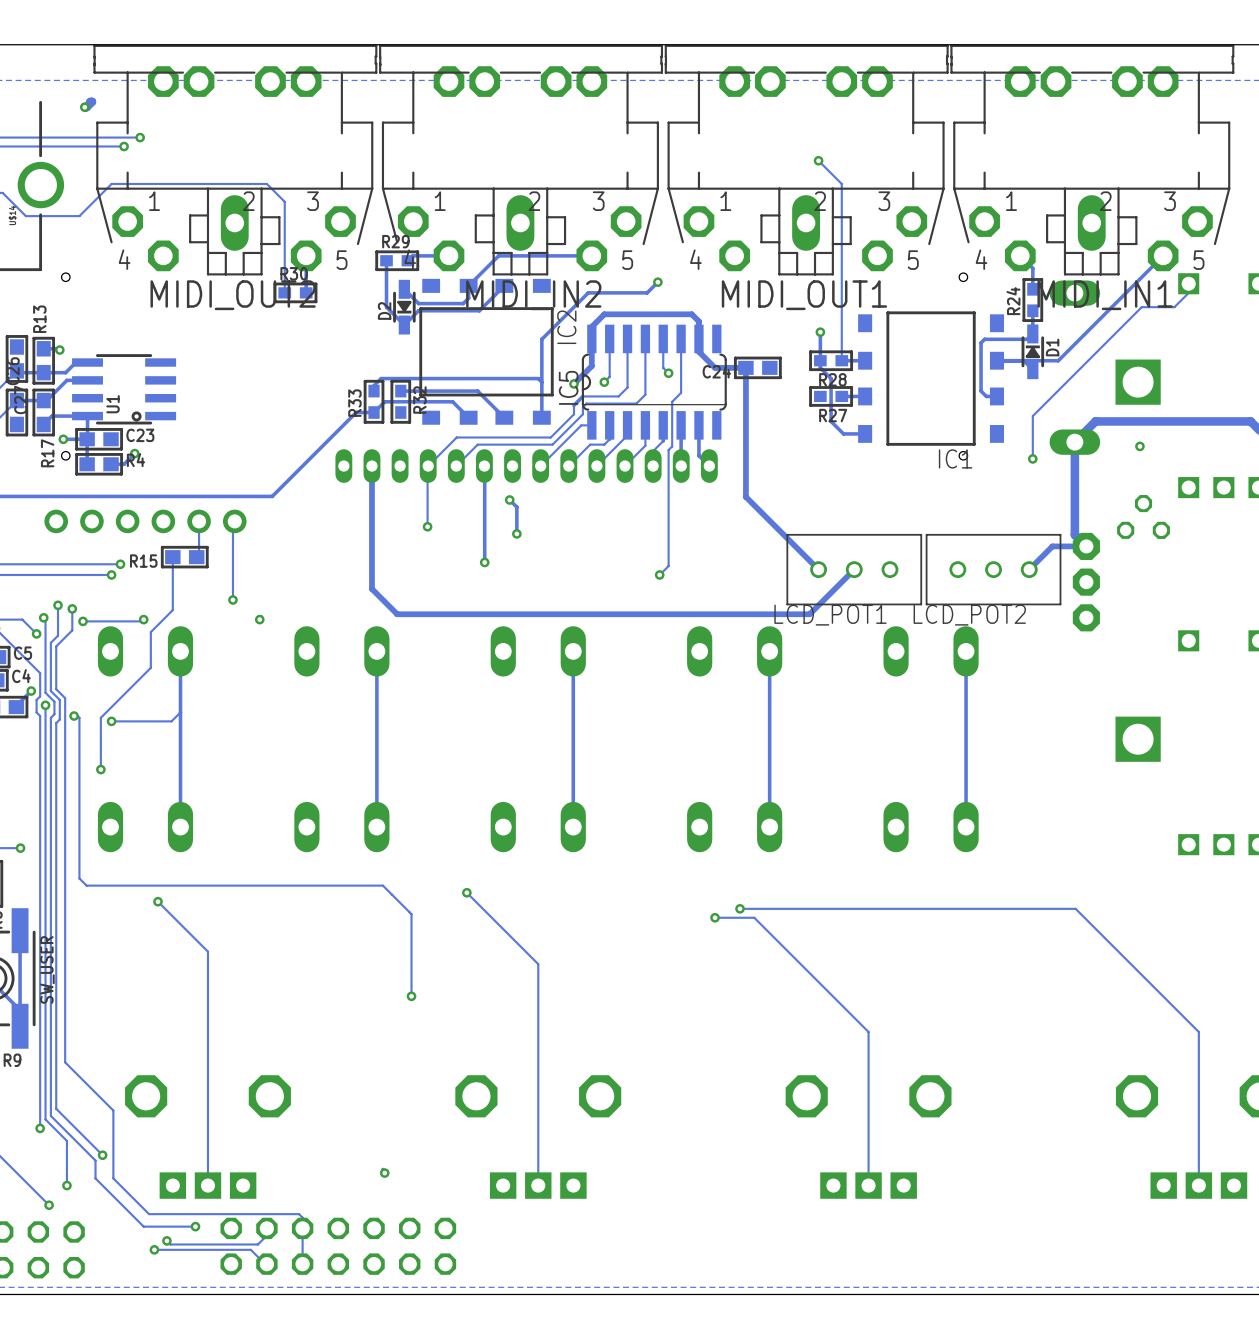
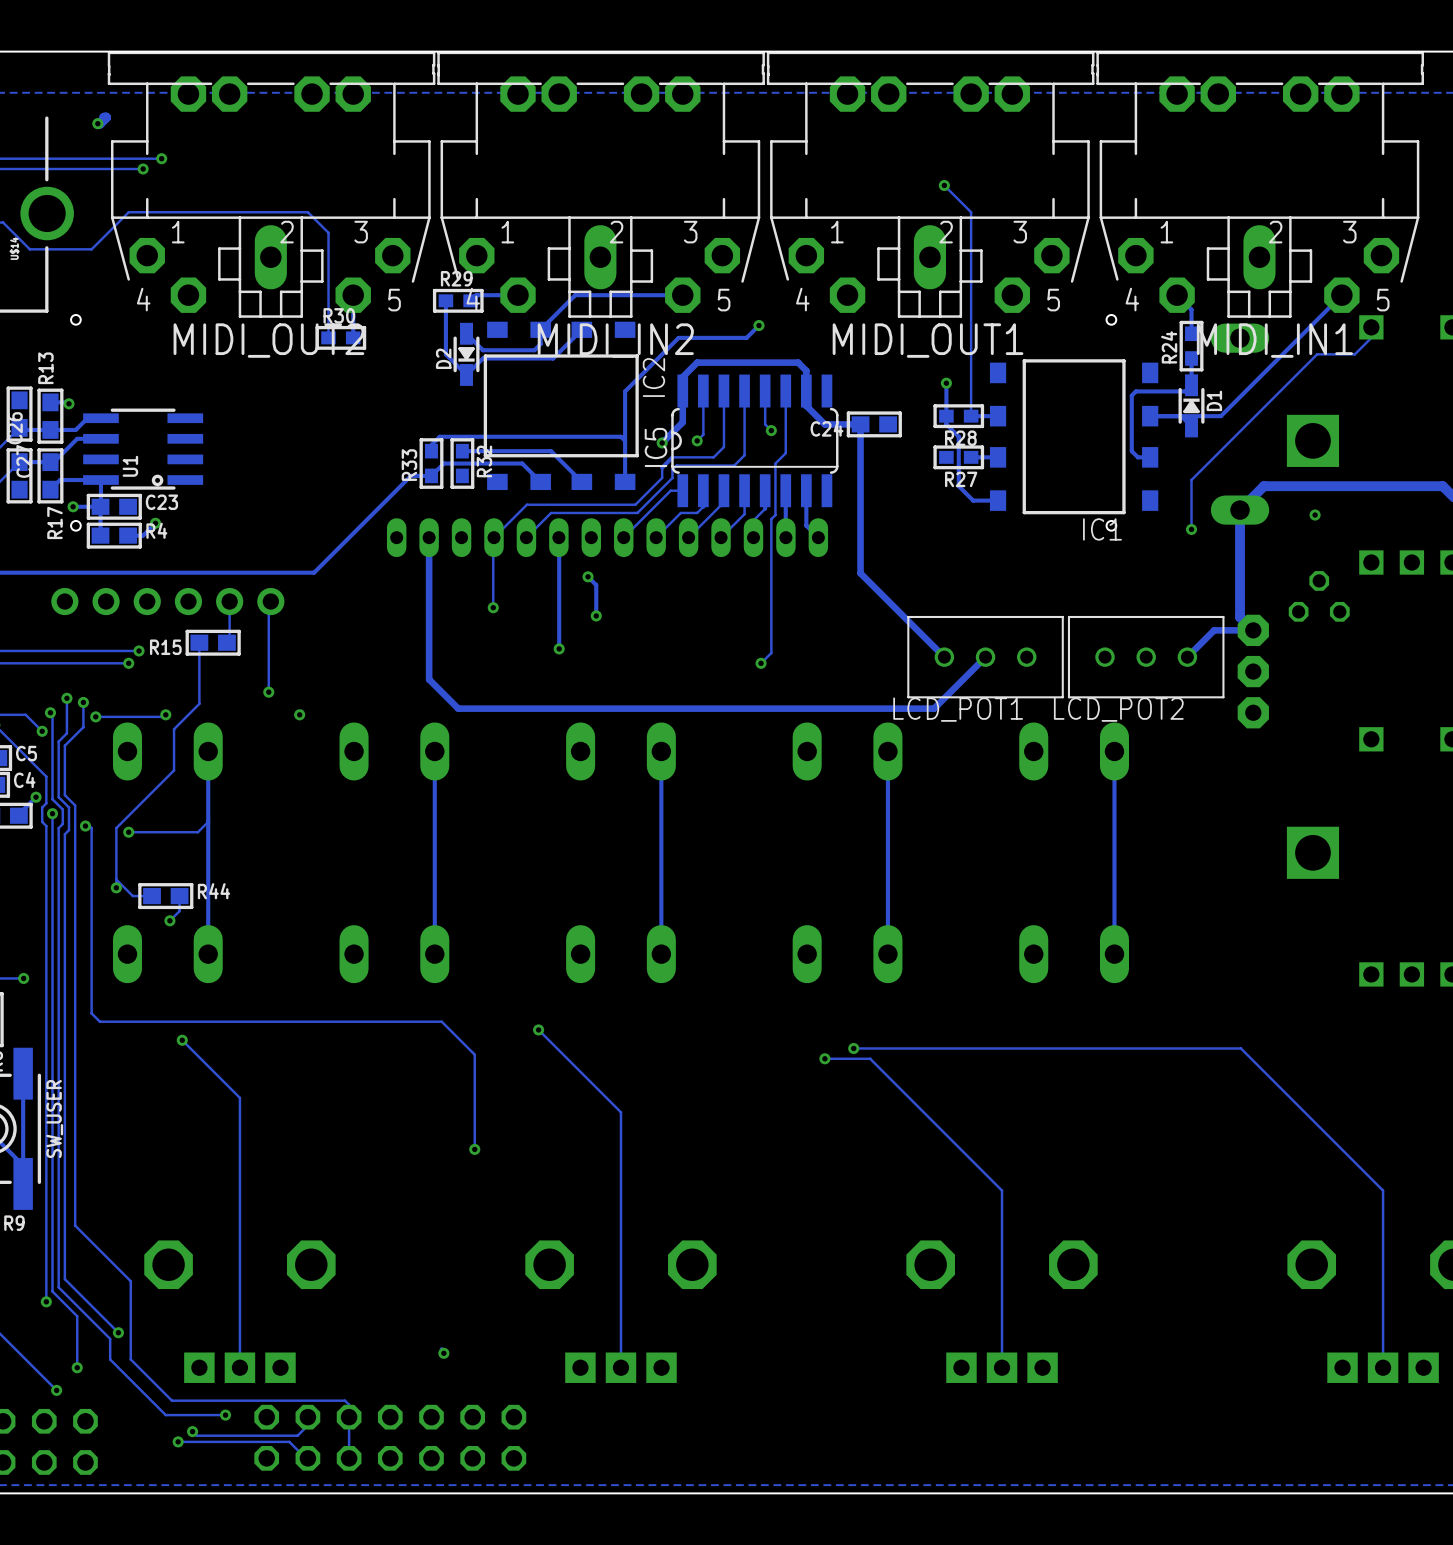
track: none -> (116, 879) (132, 896) (152, 896)
R44: none -> (165, 896)
track: none -> (179, 896) (179, 911) (169, 920)
via: none -> (169, 920)

